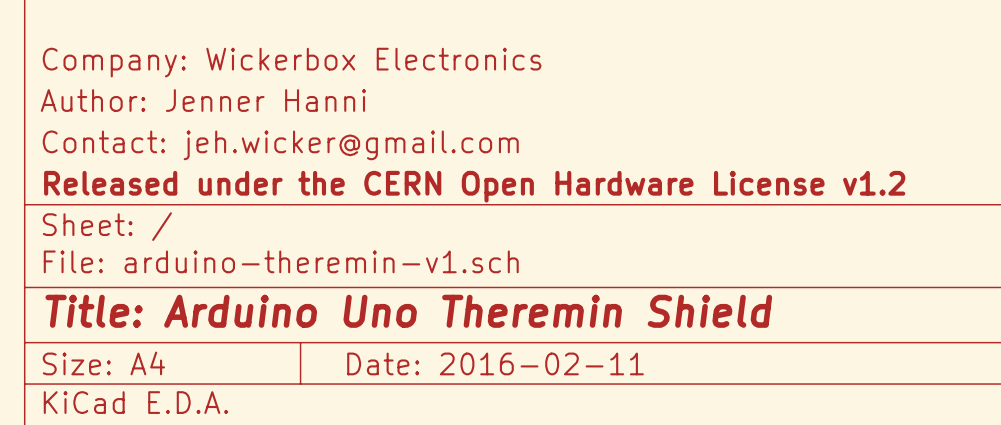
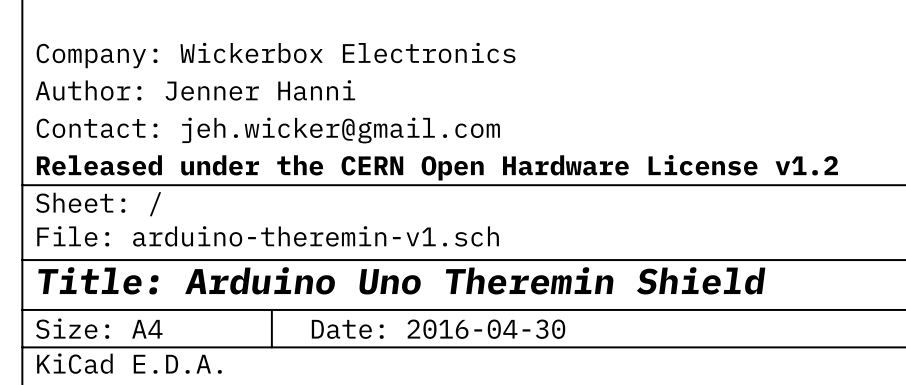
title block: Date: 2016-02-11 (495, 363) -> Date: 2016-04-30 (438, 329)

